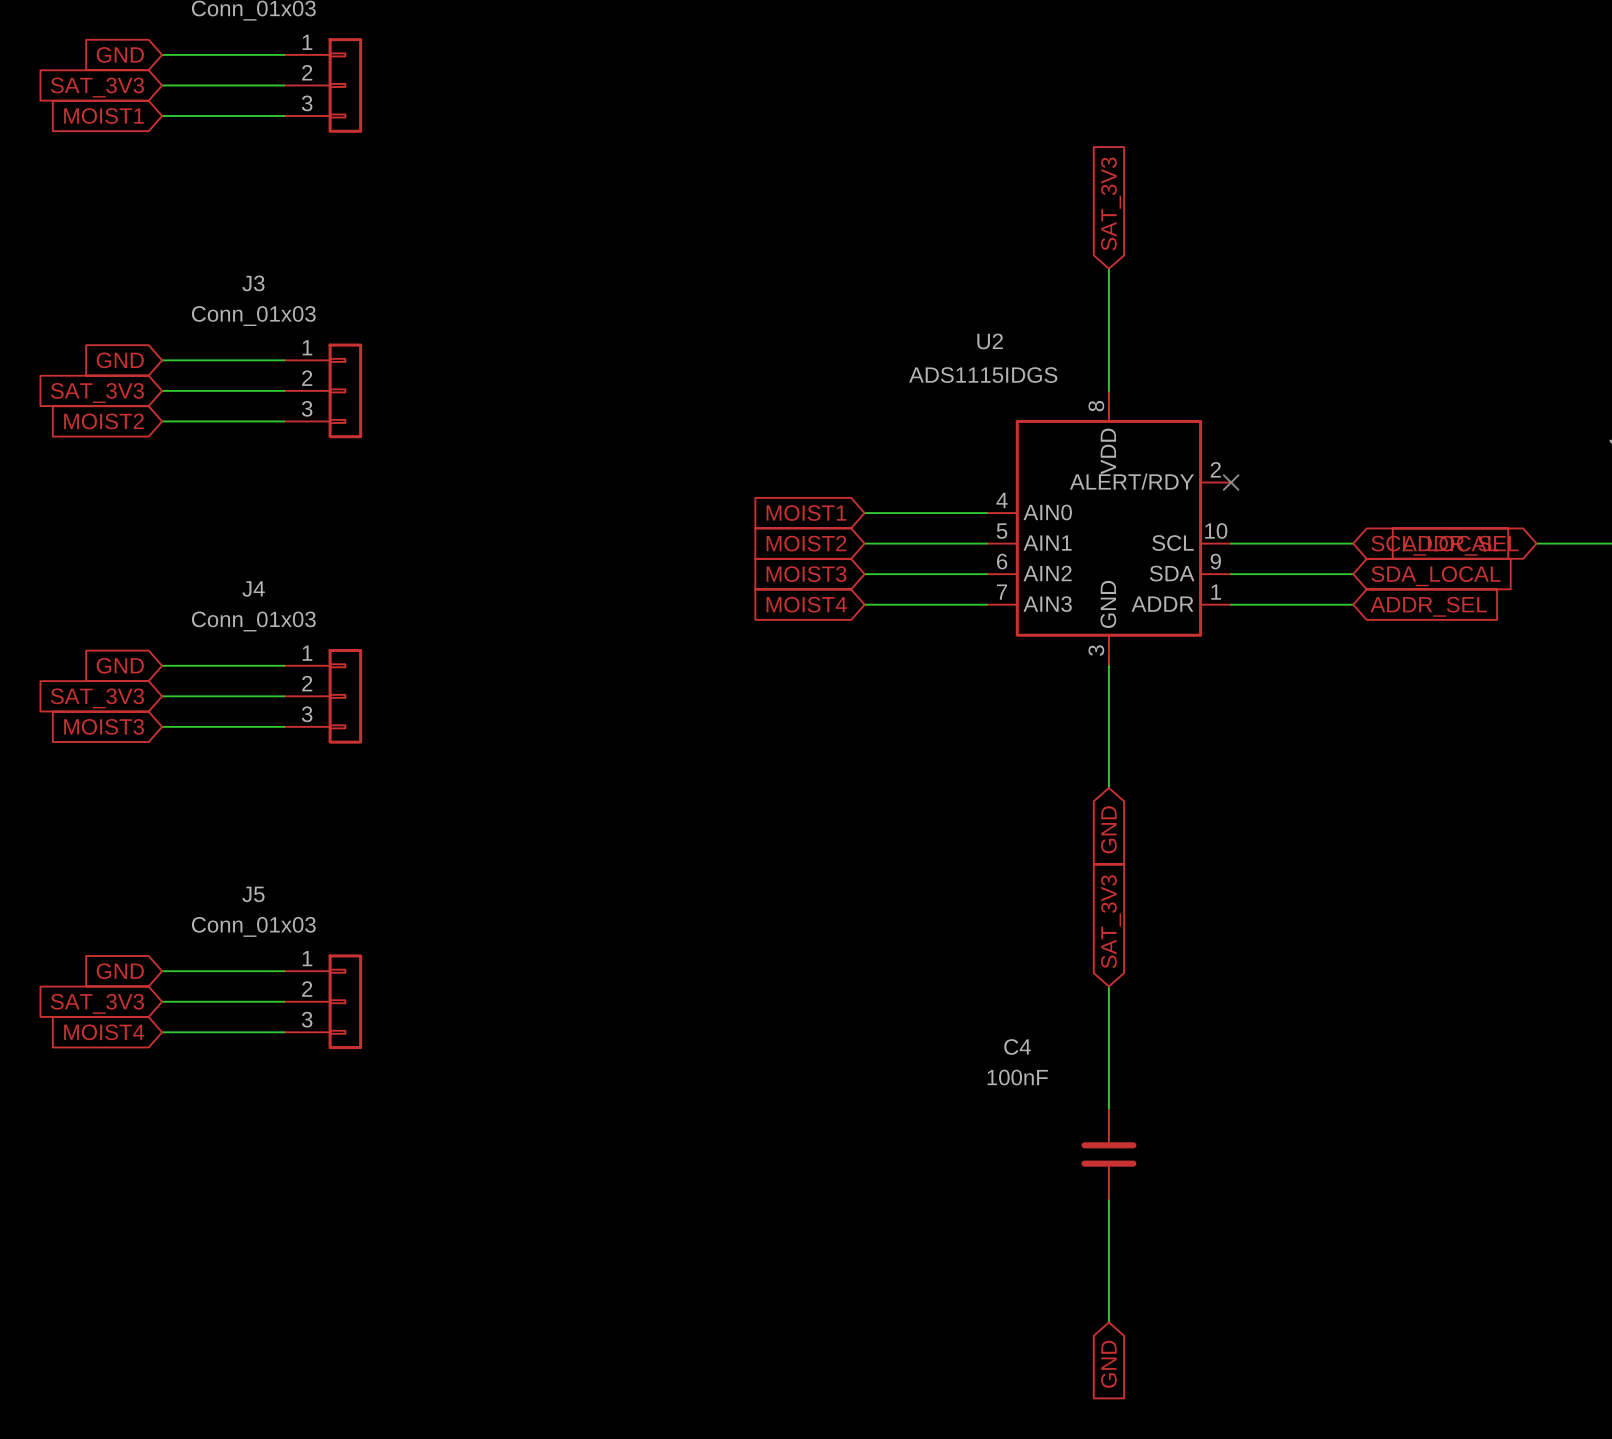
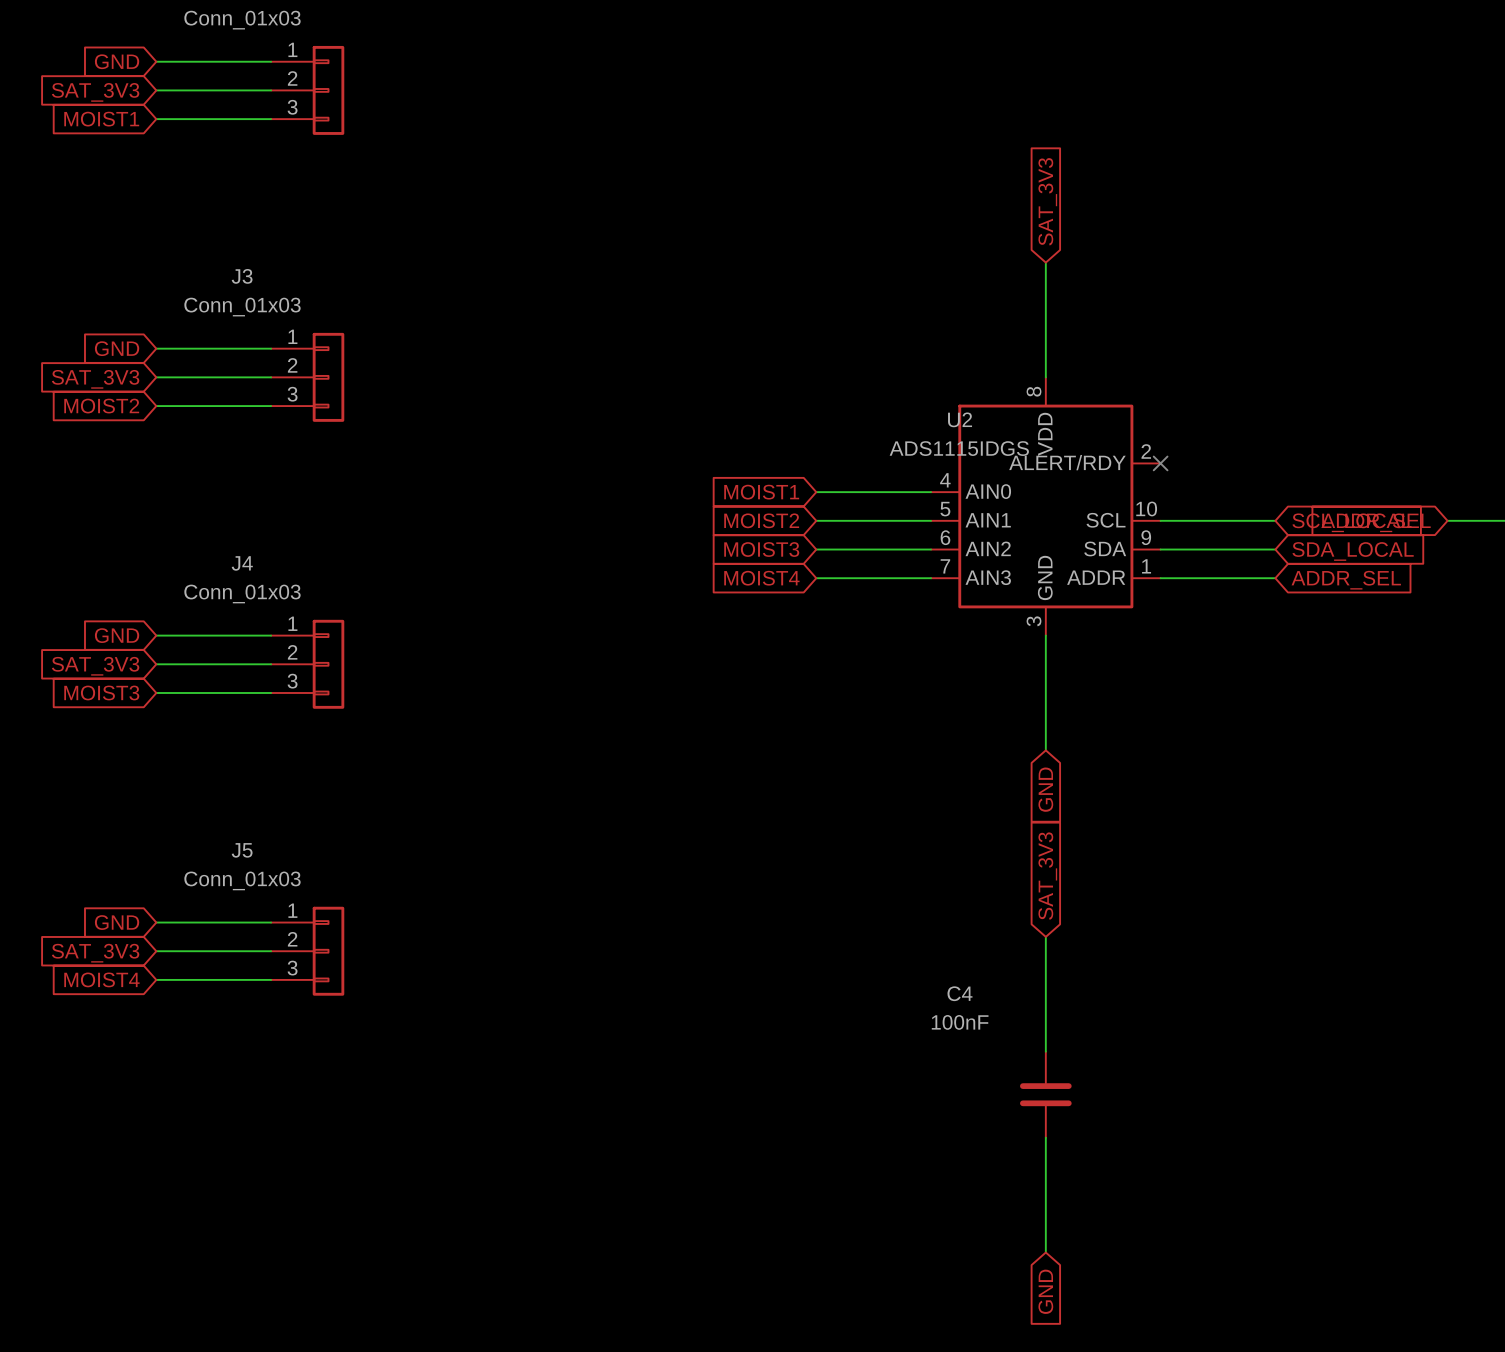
U2 name position: U2 (990, 341) -> U2 (960, 419)
U2 value position: ADS1115IDGS (983, 375) -> ADS1115IDGS (959, 448)

